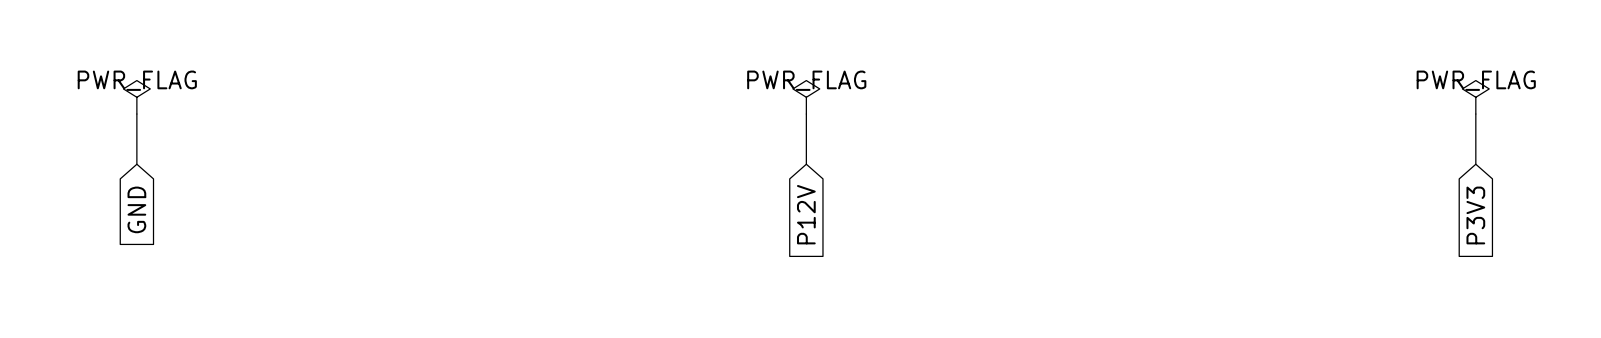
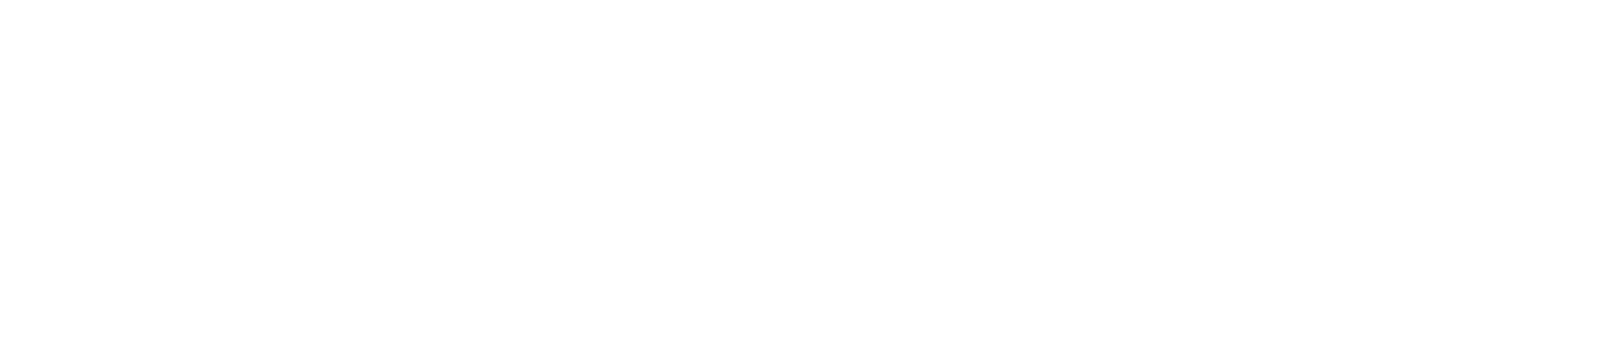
power symbol: PWR_FLAG (136, 97) -> none
power symbol: PWR_FLAG (806, 97) -> none
power symbol: PWR_FLAG (1475, 97) -> none
wire: (136, 114) (136, 164) -> none
wire: (806, 114) (806, 164) -> none
wire: (1475, 114) (1475, 164) -> none
global label: GND (136, 209) -> none
global label: P12V (806, 214) -> none
global label: P3V3 (1475, 215) -> none

